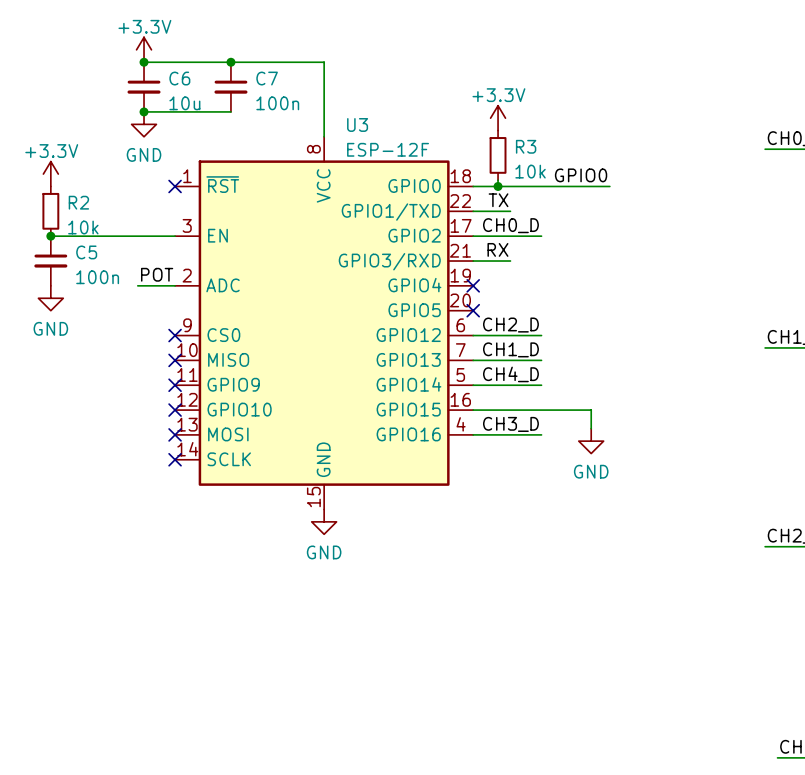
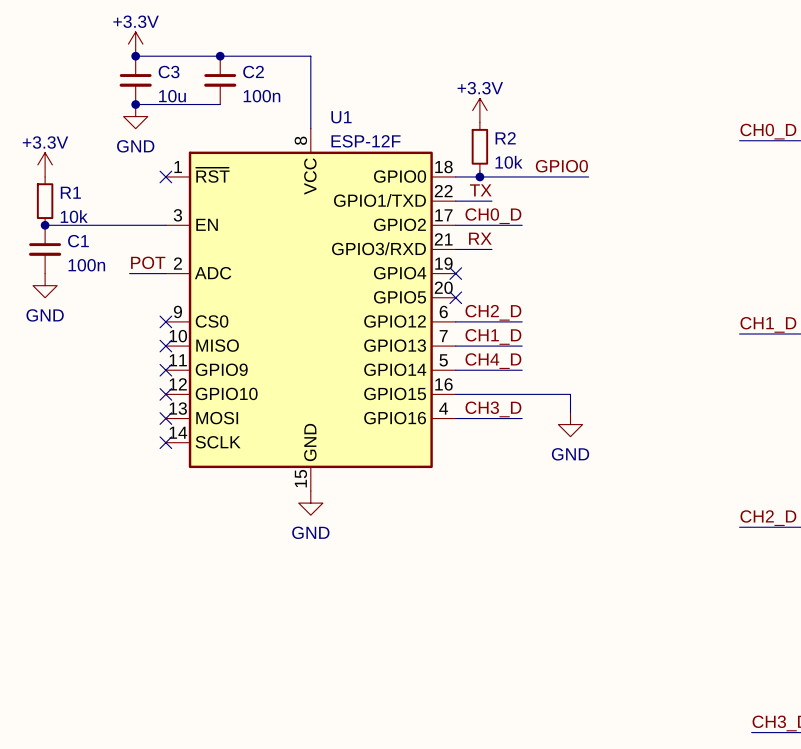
C6 name: C6 (179, 78) -> C3 (169, 72)
C7 name: C7 (267, 78) -> C2 (253, 72)
U3 name: U3 (357, 124) -> U1 (341, 117)
R3 name: R3 (526, 146) -> R2 (505, 138)
R2 name: R2 (78, 202) -> R1 (70, 192)
C5 name: C5 (86, 252) -> C1 (78, 241)

